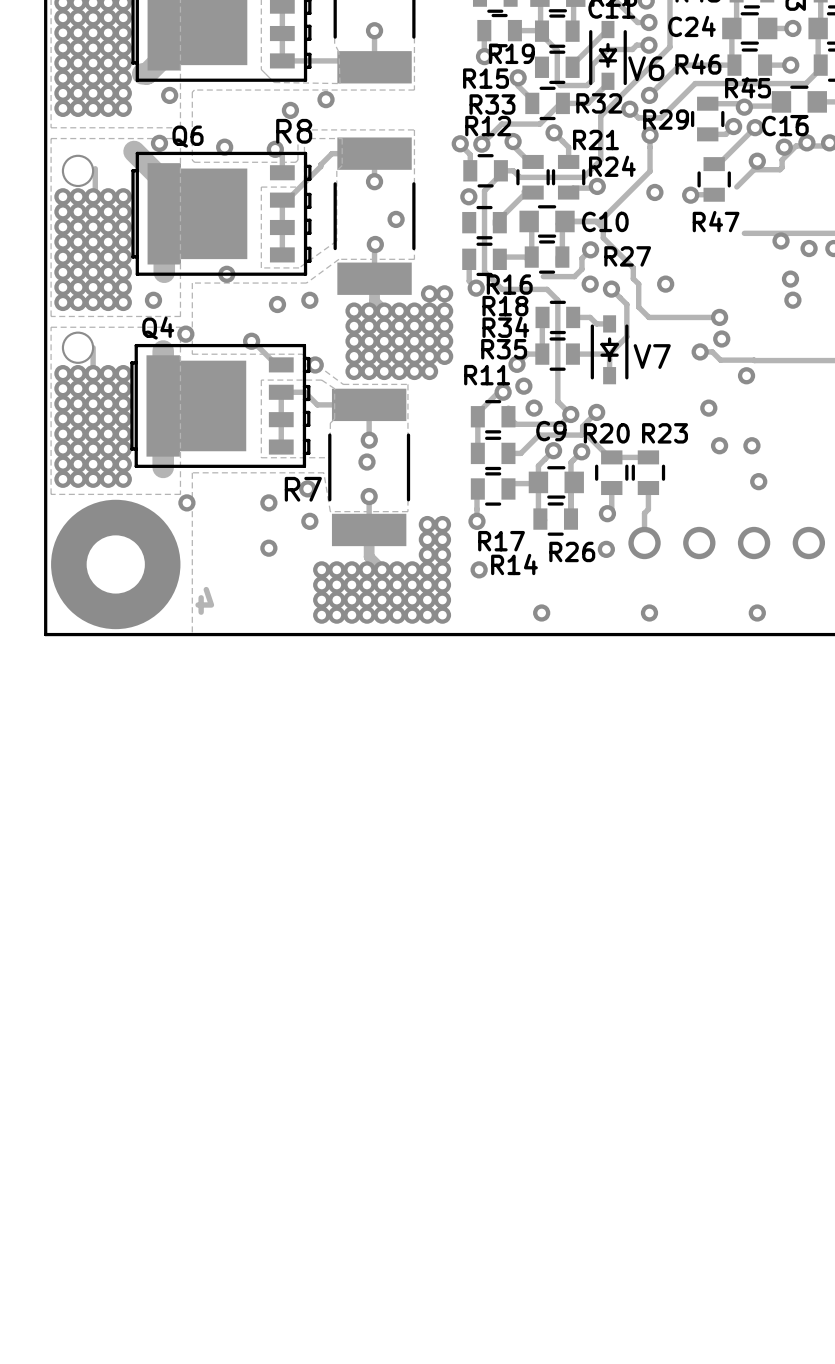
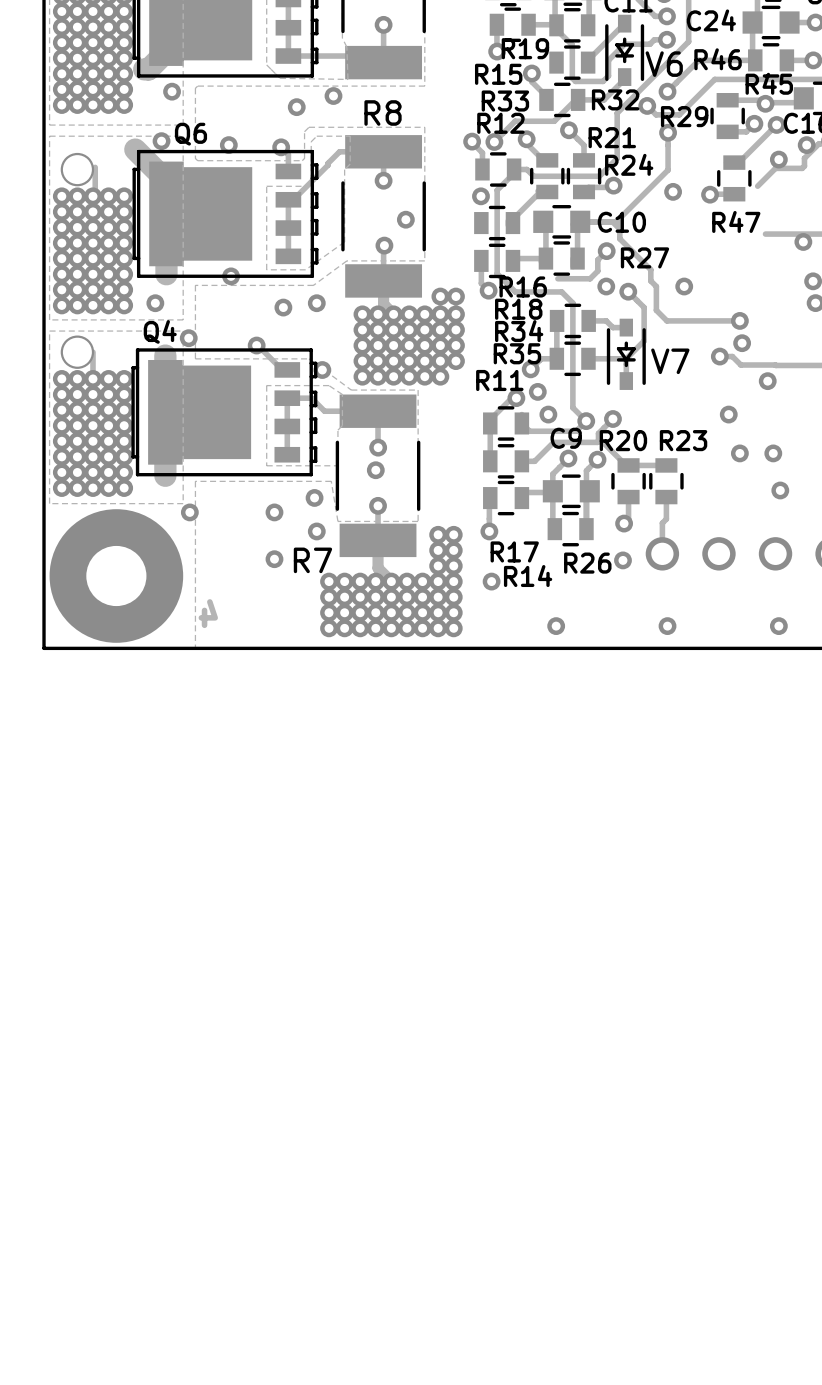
R8 name position: R8 (294, 131) -> R8 (383, 112)
R7 name position: R7 (303, 489) -> R7 (312, 560)

